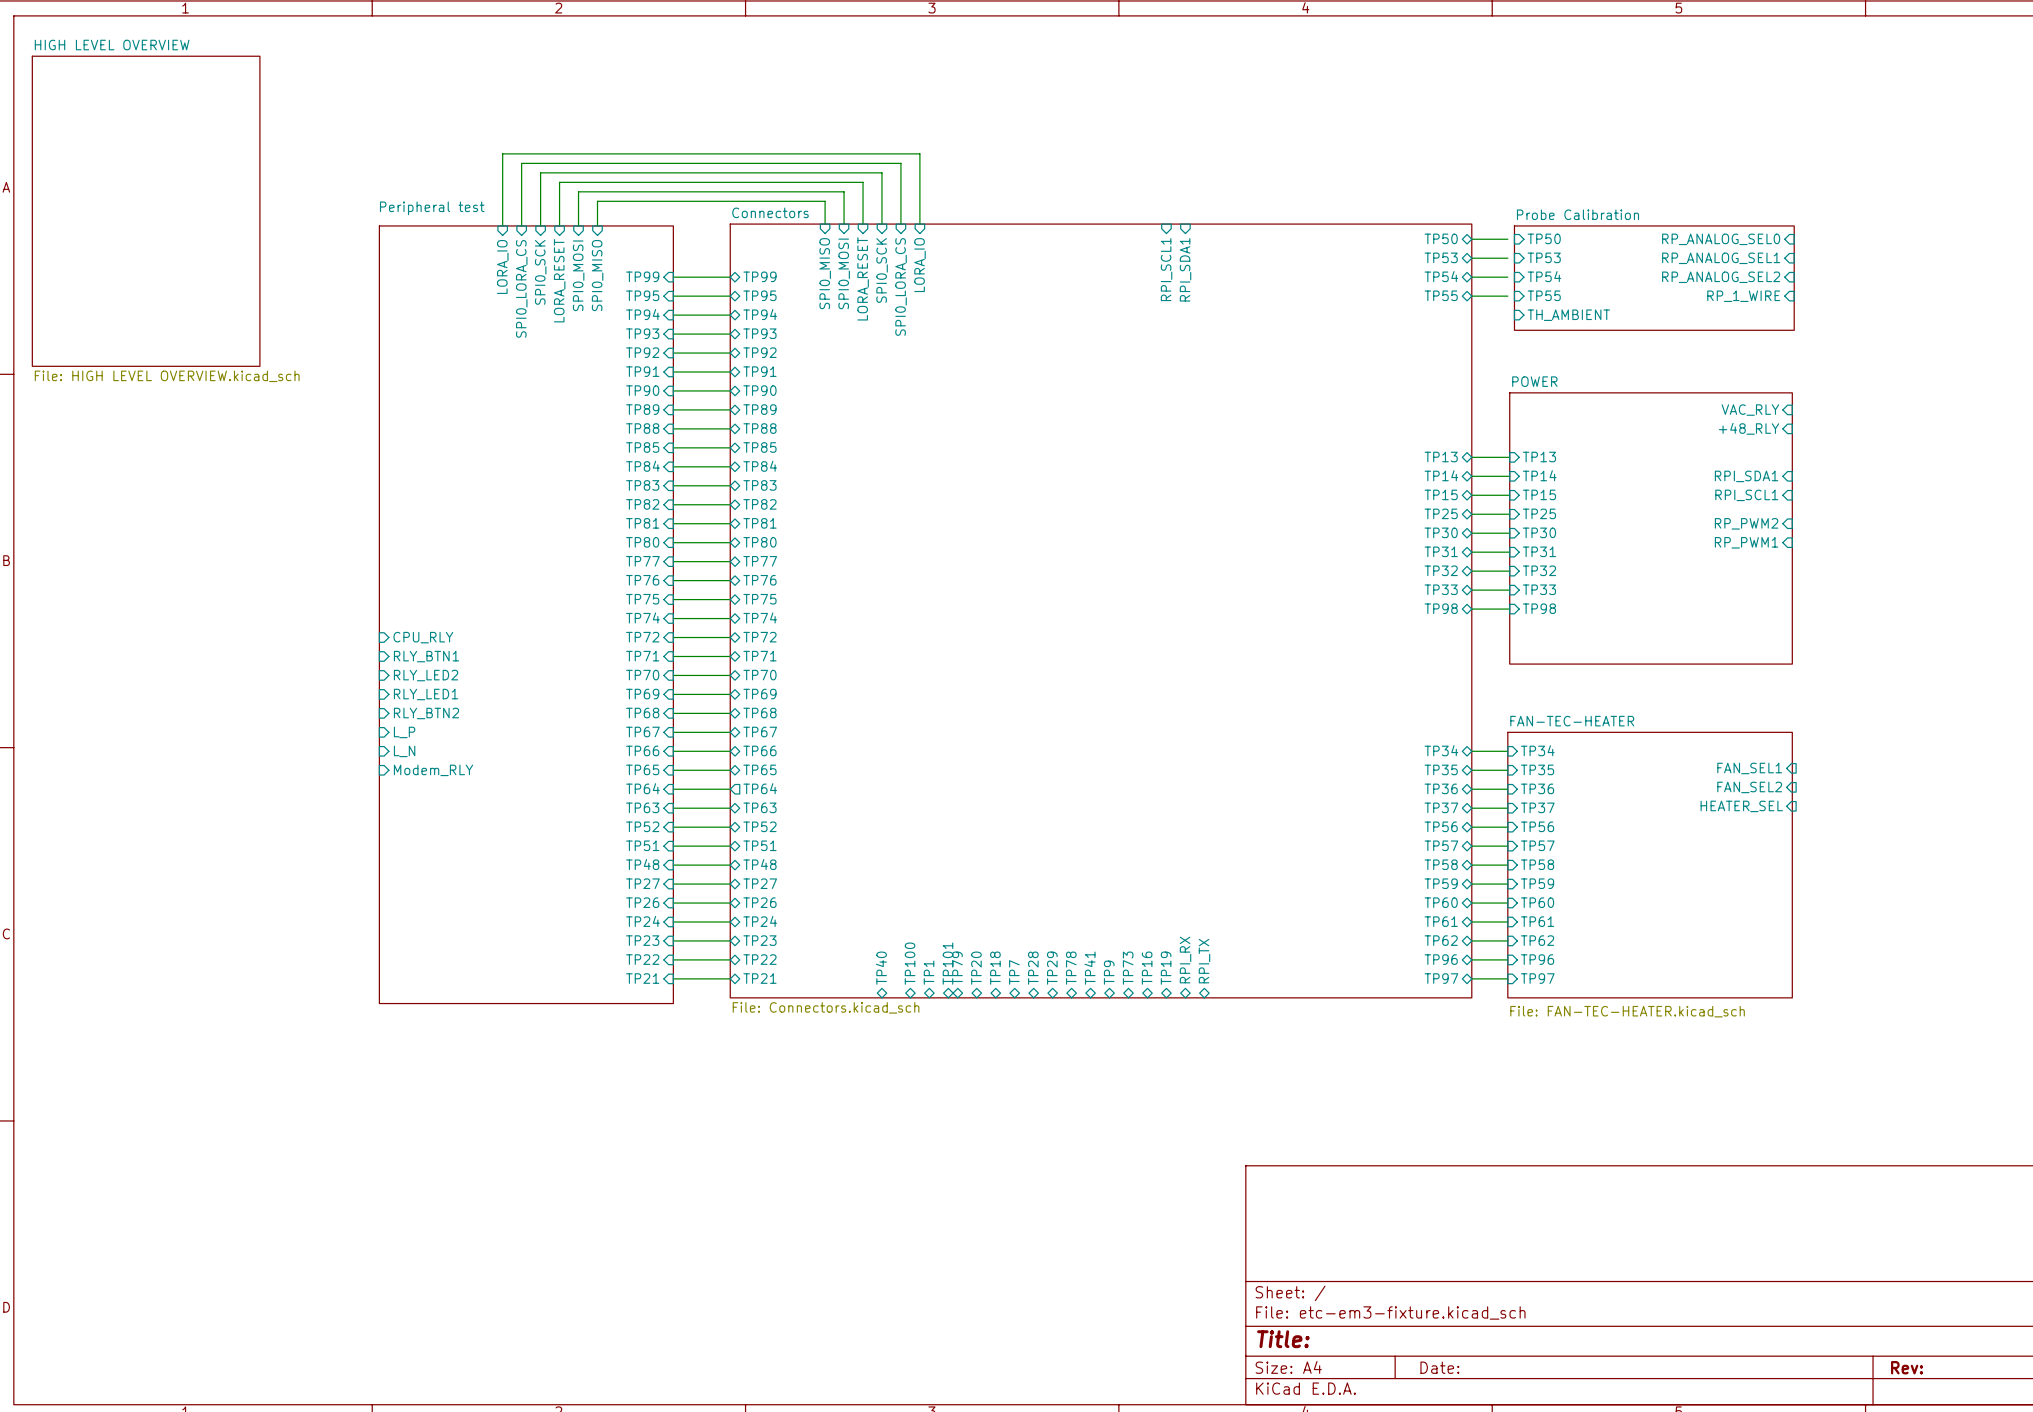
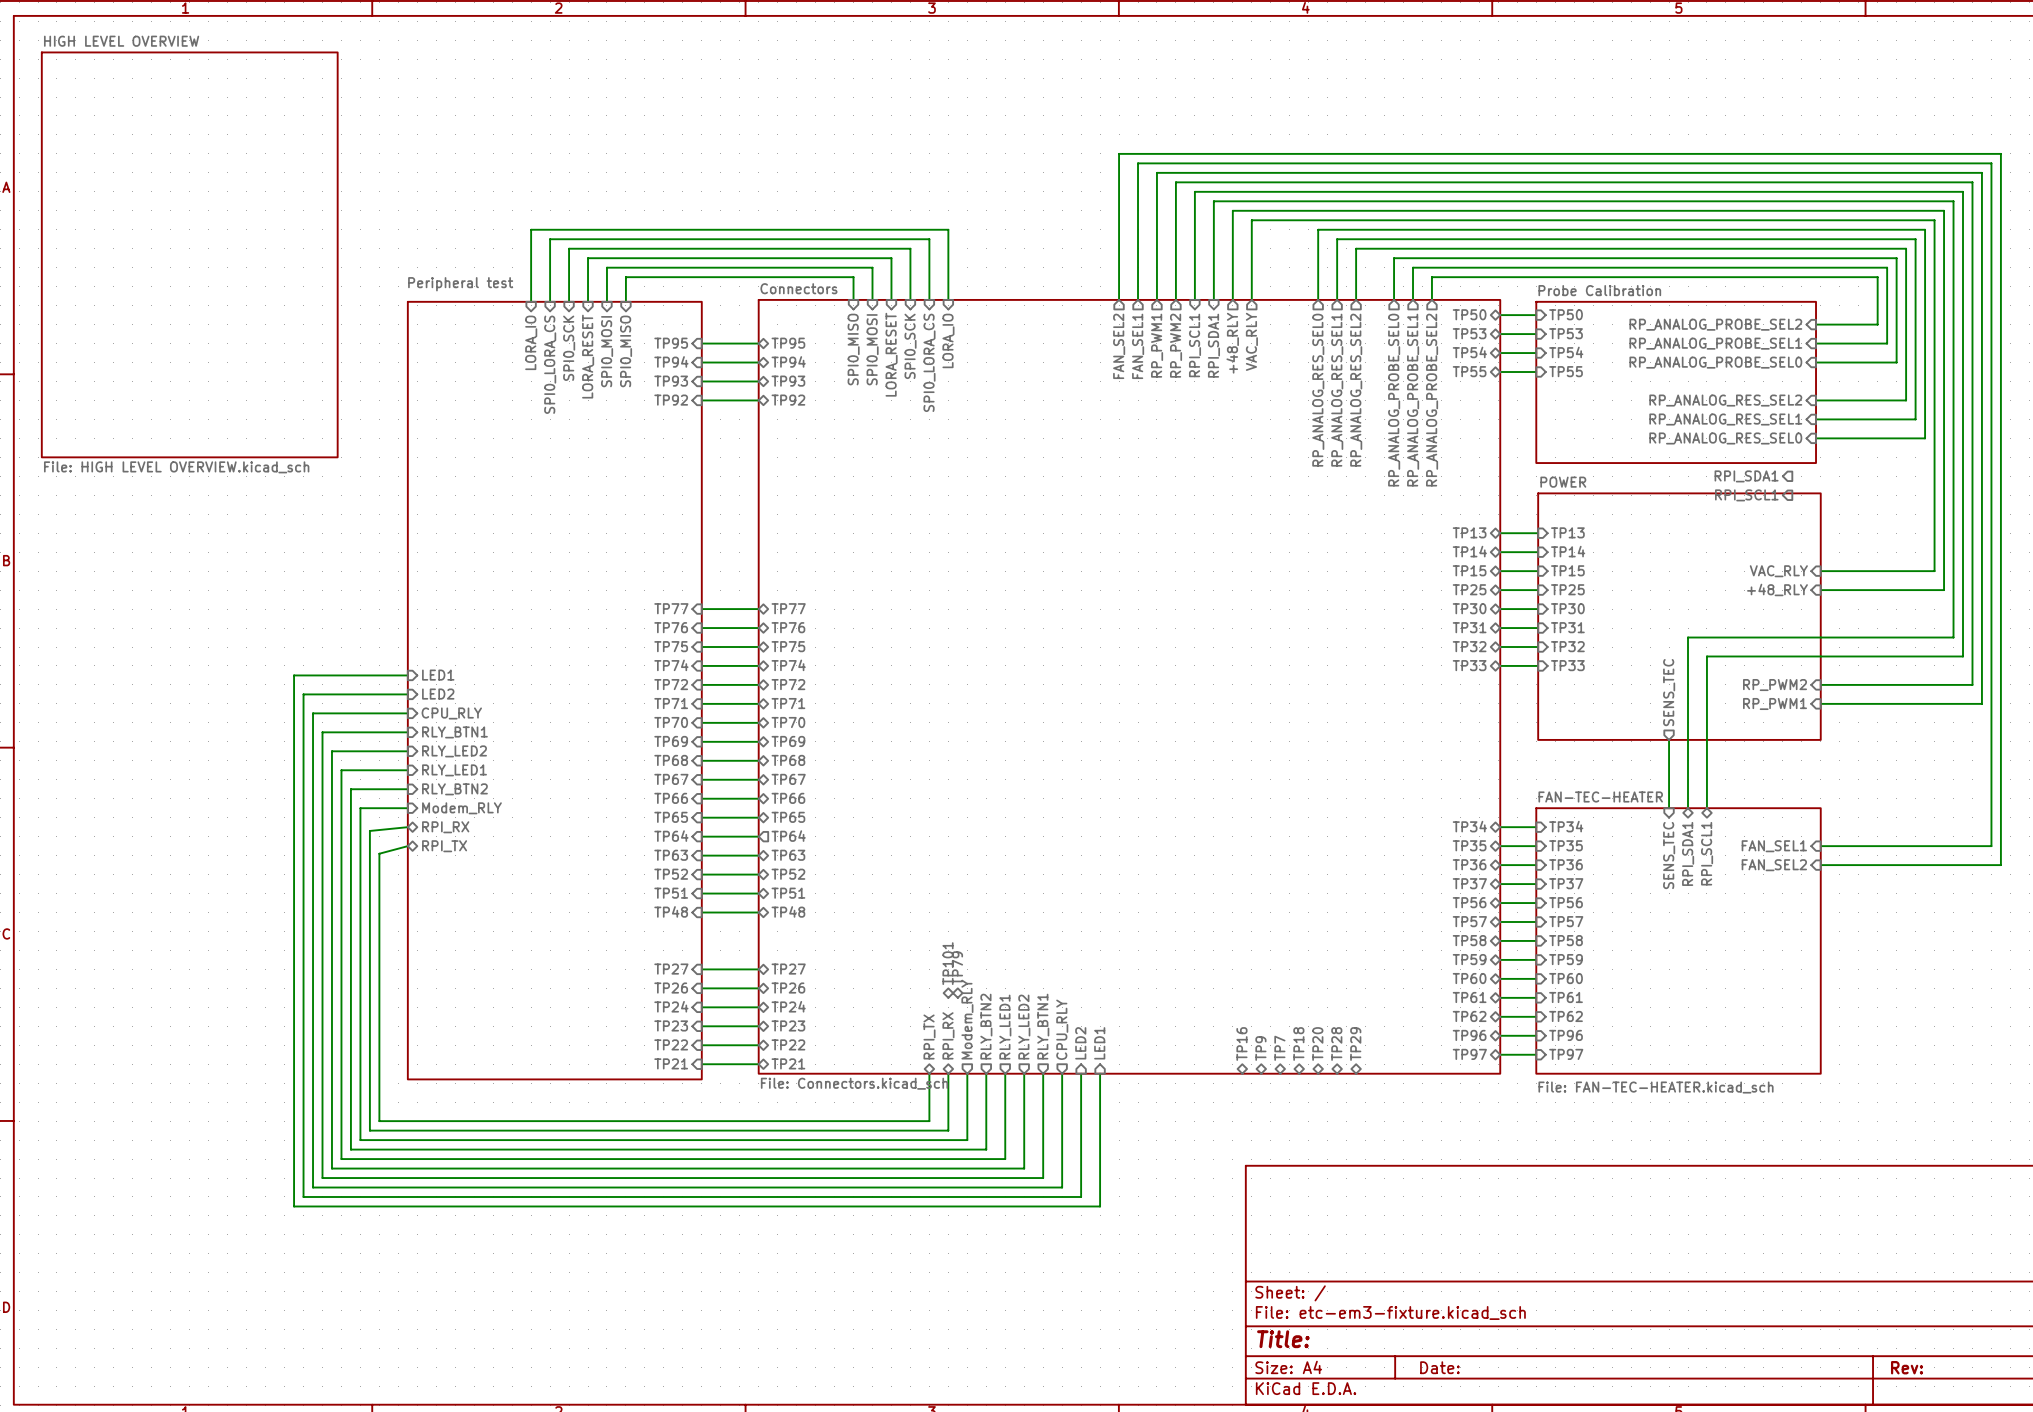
sheet HIGH LEVEL OVERVIEW: File: HIGH LEVEL OVERVIEW.kicad_sch (146, 211) -> none
wire: (825, 224) (825, 201) (597, 201) (597, 225) -> none
wire: (844, 224) (844, 191) (578, 191) (578, 225) -> (872, 299) (872, 267) (606, 267) (606, 301)
wire: (863, 224) (863, 182) (559, 182) (559, 225) -> (891, 299) (891, 258) (588, 258) (588, 301)
wire: (881, 224) (881, 172) (540, 172) (540, 225) -> (910, 299) (910, 248) (569, 248) (569, 301)
wire: (900, 224) (900, 163) (521, 163) (521, 225) -> (929, 299) (929, 239) (550, 239) (550, 301)
wire: (919, 224) (919, 153) (502, 153) (502, 225) -> (948, 299) (948, 229) (531, 229) (531, 301)
sheet pin: TP50 (1441, 238) -> none
sheet pin: TP50 (1544, 238) -> none
wire: none -> (1471, 239) (1337, 239) (1337, 299)
wire: none -> (1507, 239) (1915, 239) (1915, 419) (1816, 419)
sheet pin: RP_ANALOG_SEL0 (1721, 239) -> none
sheet HIGH LEVEL OVERVIEW: none -> File: HIGH LEVEL OVERVIEW.kicad_sch (189, 254)
sheet pin: TP53 (1441, 257) -> none
sheet pin: TP53 (1544, 257) -> none
wire: none -> (1471, 258) (1394, 258) (1394, 299)
wire: none -> (1507, 258) (1896, 258) (1896, 362) (1816, 362)
sheet pin: RP_ANALOG_SEL1 (1721, 258) -> none
sheet pin position: LORA_IO (920, 265) -> LORA_IO (948, 340)
sheet pin position: LORA_IO (502, 266) -> LORA_IO (531, 342)
sheet pin position: RPI_SCL1 (1166, 269) -> RPI_SCL1 (1195, 345)
sheet pin position: RPI_SDA1 (1185, 269) -> RPI_SDA1 (1213, 345)
sheet pin position: SPI0_SCK (882, 270) -> SPI0_SCK (910, 346)
sheet pin position: SPI0_SCK (540, 272) -> SPI0_SCK (569, 348)
sheet pin position: SPI0_MISO (825, 273) -> SPI0_MISO (853, 349)
sheet pin position: SPI0_MOSI (844, 273) -> SPI0_MOSI (872, 349)
sheet pin position: SPI0_MOSI (578, 275) -> SPI0_MOSI (607, 351)
sheet pin position: SPI0_MISO (597, 275) -> SPI0_MISO (626, 351)
sheet pin: TP99 (642, 276) -> none
sheet pin: TP99 (759, 276) -> none
sheet pin: TP54 (1441, 276) -> none
sheet pin: TP54 (1544, 276) -> none
wire: none -> (673, 277) (625, 277) (625, 301)
wire: none -> (730, 277) (853, 277) (853, 299)
wire: none -> (1471, 277) (1431, 277) (1431, 299)
wire: none -> (1507, 277) (1877, 277) (1877, 324) (1816, 324)
sheet pin: RP_ANALOG_SEL2 (1721, 277) -> none
sheet pin position: LORA_RESET (863, 278) -> LORA_RESET (891, 354)
sheet Probe Calibration: (1654, 278) -> none
sheet pin position: LORA_RESET (559, 280) -> LORA_RESET (588, 356)
sheet pin position: SPI0_LORA_CS (901, 286) -> SPI0_LORA_CS (929, 362)
sheet pin position: SPI0_LORA_CS (521, 288) -> SPI0_LORA_CS (550, 364)
sheet pin: TP95 (642, 295) -> none
sheet pin: TP95 (759, 295) -> none
sheet pin: TP55 (1441, 295) -> TP50 (1469, 314)
sheet pin: TP55 (1544, 295) -> TP50 (1566, 314)
wire: (673, 296) (730, 296) -> (701, 343) (758, 343)
wire: (1471, 296) (1507, 296) -> (1500, 372) (1536, 372)
sheet pin: RP_1_WIRE (1743, 296) -> none
wire: none -> (1119, 299) (1119, 153) (2000, 153) (2000, 865) (1820, 865)
wire: none -> (1138, 299) (1138, 163) (1991, 163) (1991, 846) (1820, 846)
wire: none -> (1156, 299) (1156, 172) (1981, 172) (1981, 703) (1820, 703)
wire: none -> (1175, 299) (1175, 182) (1972, 182) (1972, 684) (1820, 684)
wire: none -> (1194, 299) (1194, 191) (1963, 191) (1963, 656) (1706, 656) (1706, 808)
wire: none -> (1213, 299) (1213, 201) (1953, 201) (1953, 637) (1688, 637) (1688, 808)
wire: none -> (1232, 299) (1232, 210) (1944, 210) (1944, 590) (1820, 590)
wire: none -> (1251, 299) (1251, 220) (1934, 220) (1934, 571) (1820, 571)
wire: none -> (1318, 299) (1318, 229) (1925, 229) (1925, 438) (1816, 438)
wire: none -> (1356, 299) (1356, 248) (1906, 248) (1906, 400) (1816, 400)
wire: none -> (1413, 299) (1413, 267) (1887, 267) (1887, 343) (1816, 343)
sheet pin: TP94 (642, 314) -> none
sheet pin: TP94 (760, 314) -> none
wire: (673, 315) (730, 315) -> (701, 362) (758, 362)
wire: none -> (1500, 315) (1536, 315)
sheet pin: TH_AMBIENT (1568, 315) -> none
sheet pin: none -> RP_ANALOG_PROBE_SEL2 (1715, 324)
sheet pin: TP93 (642, 333) -> none
sheet pin: TP93 (759, 333) -> none
sheet pin: none -> TP53 (1469, 333)
sheet pin: none -> TP53 (1566, 333)
wire: (673, 334) (730, 334) -> (701, 381) (758, 381)
wire: none -> (1500, 334) (1536, 334)
sheet pin: none -> VAC_RLY (1251, 341)
sheet pin: none -> TP95 (671, 343)
sheet pin: none -> TP95 (788, 343)
sheet pin: none -> +48_RLY (1232, 343)
sheet pin: none -> RP_ANALOG_PROBE_SEL1 (1715, 343)
sheet pin: none -> RP_PWM1 (1157, 345)
sheet pin: none -> RP_PWM2 (1176, 345)
sheet pin: none -> FAN_SEL2 (1119, 346)
sheet pin: none -> FAN_SEL1 (1138, 346)
sheet pin: TP92 (642, 352) -> none
sheet pin: TP92 (759, 352) -> none
sheet pin: none -> TP54 (1469, 352)
sheet pin: none -> TP54 (1566, 352)
wire: (673, 353) (730, 353) -> (701, 400) (758, 400)
wire: none -> (1500, 353) (1536, 353)
sheet pin: none -> TP94 (671, 361)
sheet pin: none -> TP94 (788, 361)
sheet pin: none -> RP_ANALOG_PROBE_SEL0 (1715, 362)
sheet pin: TP91 (642, 371) -> none
sheet pin: TP91 (759, 371) -> none
sheet pin: none -> TP55 (1469, 371)
sheet pin: none -> TP55 (1566, 371)
wire: (673, 372) (730, 372) -> none
sheet pin: none -> TP93 (671, 381)
sheet pin: none -> TP93 (788, 381)
sheet Probe Calibration: none -> (1676, 382)
sheet pin: TP90 (642, 390) -> none
wire: (673, 390) (730, 390) -> none
sheet pin: TP90 (759, 390) -> none
sheet pin: none -> RP_ANALOG_RES_SEL0 (1318, 390)
sheet pin: none -> RP_ANALOG_RES_SEL1 (1337, 390)
sheet pin: none -> RP_ANALOG_RES_SEL2 (1356, 390)
sheet pin: none -> TP92 (671, 400)
sheet pin: none -> TP92 (788, 400)
sheet pin: none -> RP_ANALOG_PROBE_SEL0 (1394, 400)
sheet pin: none -> RP_ANALOG_PROBE_SEL1 (1413, 400)
sheet pin: none -> RP_ANALOG_PROBE_SEL2 (1432, 400)
sheet pin: none -> RP_ANALOG_RES_SEL2 (1725, 400)
sheet pin: TP89 (642, 409) -> none
wire: (673, 409) (730, 409) -> none
sheet pin: TP89 (759, 409) -> none
sheet pin position: VAC_RLY (1750, 410) -> VAC_RLY (1778, 571)
sheet pin: none -> RP_ANALOG_RES_SEL1 (1725, 419)
sheet pin: TP88 (642, 428) -> none
wire: (673, 428) (730, 428) -> none
sheet pin: TP88 (759, 428) -> none
sheet pin position: +48_RLY (1749, 428) -> +48_RLY (1777, 589)
sheet pin: none -> RP_ANALOG_RES_SEL0 (1725, 438)
sheet pin: TP85 (642, 447) -> none
wire: (673, 447) (730, 447) -> none
sheet pin: TP85 (759, 447) -> none
sheet pin: TP13 (1441, 456) -> none
sheet pin: TP13 (1539, 456) -> none
wire: (1471, 457) (1509, 457) -> none
sheet pin: TP84 (642, 466) -> none
wire: (673, 466) (730, 466) -> none
sheet pin: TP84 (760, 466) -> none
sheet pin: TP14 (1441, 475) -> none
sheet pin: TP14 (1539, 475) -> none
wire: (1471, 476) (1509, 476) -> (1500, 628) (1538, 628)
sheet pin: TP83 (642, 485) -> none
wire: (673, 485) (730, 485) -> none
sheet pin: TP83 (759, 485) -> none
sheet pin: TP15 (1441, 494) -> none
sheet pin: TP15 (1539, 494) -> none
wire: (1471, 495) (1509, 495) -> (1500, 647) (1538, 647)
sheet pin: TP82 (642, 504) -> none
wire: (673, 504) (730, 504) -> none
sheet pin: TP82 (759, 504) -> none
sheet pin: TP25 (1441, 513) -> none
sheet pin: TP25 (1539, 513) -> none
wire: (1471, 514) (1509, 514) -> (1500, 665) (1538, 665)
sheet pin: TP81 (642, 523) -> none
wire: (673, 523) (730, 523) -> none
sheet pin: TP81 (759, 523) -> none
sheet pin position: RP_PWM2 (1746, 523) -> RP_PWM2 (1775, 685)
sheet POWER: (1651, 528) -> none
sheet pin: TP30 (1441, 532) -> none
sheet pin: none -> TP13 (1469, 532)
sheet pin: TP30 (1539, 532) -> none
sheet pin: none -> TP13 (1567, 532)
wire: (1471, 533) (1500, 533) -> (1509, 533) (1538, 533)
sheet pin: TP80 (642, 542) -> none
wire: (673, 542) (730, 542) -> none
sheet pin: TP80 (759, 542) -> none
sheet pin position: RP_PWM1 (1746, 542) -> RP_PWM1 (1775, 703)
sheet pin: TP31 (1441, 551) -> none
sheet pin: none -> TP14 (1469, 551)
sheet pin: TP31 (1539, 551) -> none
sheet pin: none -> TP14 (1568, 551)
wire: (1471, 552) (1500, 552) -> (1509, 552) (1538, 552)
sheet pin: TP77 (642, 561) -> none
wire: (673, 561) (730, 561) -> (701, 609) (758, 609)
sheet pin: TP77 (760, 561) -> none
sheet pin: TP32 (1441, 570) -> TP25 (1469, 589)
sheet pin: none -> TP15 (1469, 570)
sheet pin: TP32 (1539, 570) -> TP25 (1567, 589)
sheet pin: none -> TP15 (1567, 570)
wire: (1471, 571) (1500, 571) -> (1509, 571) (1538, 571)
sheet pin: TP76 (642, 580) -> none
wire: (673, 580) (730, 580) -> (701, 628) (758, 628)
sheet pin: TP76 (759, 580) -> none
sheet pin: TP33 (1441, 589) -> TP30 (1469, 608)
sheet pin: TP33 (1539, 589) -> TP30 (1567, 608)
wire: (1471, 590) (1500, 590) -> (1509, 590) (1538, 590)
sheet pin: TP75 (642, 599) -> none
wire: (673, 599) (730, 599) -> (701, 647) (758, 647)
sheet pin: TP75 (759, 599) -> none
sheet pin: none -> TP77 (671, 608)
sheet pin: none -> TP77 (788, 608)
sheet pin: TP98 (1441, 608) -> none
sheet pin: TP98 (1539, 608) -> none
wire: (1471, 609) (1500, 609) -> (1509, 609) (1538, 609)
sheet Connectors position: (1101, 610) -> (1129, 686)
sheet Peripheral test position: (526, 614) -> (554, 690)
sheet POWER: none -> (1679, 616)
sheet pin: TP74 (642, 617) -> none
sheet pin: TP74 (760, 617) -> none
wire: (673, 618) (730, 618) -> (701, 665) (758, 665)
sheet pin: none -> TP76 (671, 627)
sheet pin: none -> TP76 (788, 627)
sheet pin: none -> TP31 (1469, 627)
sheet pin: none -> TP31 (1567, 627)
sheet pin position: CPU_RLY (423, 637) -> CPU_RLY (451, 713)
sheet pin: TP72 (642, 637) -> none
wire: (673, 637) (730, 637) -> (701, 684) (758, 684)
sheet pin: TP72 (759, 637) -> none
sheet pin: none -> TP75 (671, 646)
sheet pin: none -> TP75 (788, 646)
sheet pin: none -> TP32 (1469, 646)
sheet pin: none -> TP32 (1567, 646)
sheet pin position: RLY_BTN1 (426, 656) -> RLY_BTN1 (454, 732)
sheet pin: TP71 (642, 656) -> none
wire: (673, 656) (730, 656) -> (701, 703) (758, 703)
sheet pin: TP71 (759, 656) -> none
sheet pin: none -> TP74 (671, 665)
sheet pin: none -> TP74 (788, 665)
sheet pin: none -> TP33 (1469, 665)
sheet pin: none -> TP33 (1567, 665)
wire: none -> (407, 675) (294, 675) (294, 1206) (1100, 1206) (1100, 1073)
sheet pin position: RLY_LED2 (426, 675) -> RLY_LED2 (454, 751)
sheet pin: none -> LED1 (438, 675)
sheet pin: TP70 (642, 675) -> none
wire: (673, 675) (730, 675) -> (701, 722) (758, 722)
sheet pin: TP70 (759, 675) -> none
sheet pin: none -> TP72 (671, 684)
sheet pin: none -> TP72 (788, 684)
sheet pin: none -> SENS_TEC (1669, 692)
wire: none -> (407, 694) (303, 694) (303, 1196) (1081, 1196) (1081, 1073)
sheet pin position: RLY_LED1 (426, 694) -> RLY_LED1 (454, 770)
sheet pin: none -> LED2 (438, 694)
sheet pin: TP69 (642, 694) -> none
wire: (673, 694) (730, 694) -> (701, 741) (758, 741)
sheet pin: TP69 (759, 694) -> none
sheet pin: none -> TP71 (671, 703)
sheet pin: none -> TP71 (788, 703)
wire: none -> (407, 713) (313, 713) (313, 1187) (1062, 1187) (1062, 1073)
sheet pin position: RLY_BTN2 (426, 713) -> RLY_BTN2 (454, 789)
sheet pin: TP68 (642, 713) -> none
wire: (673, 713) (730, 713) -> (701, 760) (758, 760)
sheet pin: TP68 (759, 713) -> none
sheet pin: none -> TP70 (671, 722)
sheet pin: none -> TP70 (788, 722)
sheet pin: TP67 (642, 731) -> none
sheet pin: TP67 (760, 731) -> none
sheet pin: L_P (404, 732) -> none
wire: none -> (407, 732) (322, 732) (322, 1178) (1043, 1178) (1043, 1073)
wire: (673, 732) (730, 732) -> (701, 779) (758, 779)
wire: none -> (1669, 739) (1669, 808)
sheet pin: none -> TP69 (671, 741)
sheet pin: none -> TP69 (788, 741)
sheet pin: TP66 (642, 750) -> none
sheet pin: TP66 (759, 750) -> none
sheet pin: TP34 (1441, 750) -> none
sheet pin: TP34 (1537, 750) -> none
sheet pin: L_N (404, 751) -> none
wire: none -> (407, 751) (331, 751) (331, 1168) (1024, 1168) (1024, 1073)
wire: (673, 751) (730, 751) -> (701, 798) (758, 798)
wire: (1471, 751) (1507, 751) -> none
sheet pin: none -> TP68 (671, 760)
sheet pin: none -> TP68 (788, 760)
sheet pin position: FAN_SEL1 (1749, 768) -> FAN_SEL1 (1774, 846)
sheet pin: TP65 (642, 769) -> none
sheet pin: TP65 (759, 769) -> none
sheet pin: TP35 (1441, 769) -> none
sheet pin: TP35 (1537, 769) -> none
wire: none -> (407, 770) (341, 770) (341, 1159) (1005, 1159) (1005, 1073)
sheet pin position: Modem_RLY (433, 770) -> Modem_RLY (461, 808)
wire: (673, 770) (730, 770) -> (701, 817) (758, 817)
wire: (1471, 770) (1507, 770) -> none
sheet pin: none -> TP67 (671, 779)
sheet pin: none -> TP67 (788, 779)
sheet pin position: FAN_SEL2 (1749, 787) -> FAN_SEL2 (1774, 865)
sheet pin: TP64 (642, 788) -> none
sheet pin: TP64 (760, 788) -> none
sheet pin: TP36 (1441, 788) -> none
sheet pin: TP36 (1537, 788) -> none
wire: none -> (407, 789) (350, 789) (350, 1149) (986, 1149) (986, 1073)
wire: (673, 789) (730, 789) -> (701, 836) (758, 836)
wire: (1471, 789) (1507, 789) -> none
sheet pin: none -> TP66 (671, 798)
sheet pin: none -> TP66 (788, 798)
sheet pin: HEATER_SEL (1741, 806) -> none
sheet pin: TP63 (642, 807) -> none
sheet pin: TP63 (759, 807) -> none
sheet pin: TP37 (1441, 807) -> TP34 (1469, 826)
sheet pin: TP37 (1537, 807) -> TP34 (1566, 826)
wire: none -> (407, 808) (360, 808) (360, 1140) (967, 1140) (967, 1073)
wire: (673, 808) (730, 808) -> (701, 855) (758, 855)
wire: (1471, 808) (1507, 808) -> none
sheet pin: none -> TP65 (671, 817)
sheet pin: none -> TP65 (788, 817)
sheet pin: TP52 (642, 826) -> none
sheet pin: TP52 (759, 826) -> none
sheet pin: TP56 (1441, 826) -> none
sheet pin: TP56 (1537, 826) -> none
wire: none -> (407, 827) (369, 830) (369, 1130) (948, 1130) (948, 1073)
sheet pin: none -> RPI_RX (445, 827)
wire: (673, 827) (730, 827) -> (701, 874) (758, 874)
wire: (1471, 827) (1500, 827) -> (1507, 827) (1536, 827)
sheet pin: none -> TP64 (671, 836)
sheet pin: none -> TP64 (788, 836)
sheet pin: TP51 (642, 845) -> none
sheet pin: TP51 (759, 845) -> none
sheet pin: TP57 (1441, 845) -> none
sheet pin: none -> TP35 (1469, 845)
sheet pin: TP57 (1537, 845) -> none
sheet pin: none -> TP35 (1566, 845)
wire: none -> (407, 846) (379, 853) (379, 1121) (929, 1121) (929, 1073)
sheet pin: none -> RPI_TX (444, 846)
wire: (673, 846) (730, 846) -> (701, 893) (758, 893)
wire: (1471, 846) (1500, 846) -> (1507, 846) (1536, 846)
sheet pin: none -> RPI_SDA1 (1688, 853)
sheet pin: none -> RPI_SCL1 (1707, 853)
sheet pin: none -> TP63 (671, 855)
sheet pin: none -> TP63 (788, 855)
sheet pin: none -> SENS_TEC (1669, 855)
sheet pin: TP48 (642, 864) -> none
sheet pin: TP48 (759, 864) -> none
sheet pin: TP58 (1441, 864) -> none
sheet pin: none -> TP36 (1469, 864)
sheet pin: TP58 (1537, 864) -> none
sheet pin: none -> TP36 (1566, 864)
wire: (673, 865) (730, 865) -> (701, 912) (758, 912)
wire: (1471, 865) (1500, 865) -> (1507, 865) (1536, 865)
sheet FAN-TEC-HEATER position: (1650, 865) -> (1678, 940)
sheet pin: TP27 (642, 883) -> TP52 (671, 874)
sheet pin: TP27 (760, 883) -> TP52 (788, 874)
sheet pin: TP59 (1441, 883) -> none
sheet pin: none -> TP37 (1469, 883)
sheet pin: TP59 (1537, 883) -> none
sheet pin: none -> TP37 (1566, 883)
wire: (673, 884) (730, 884) -> (701, 1064) (758, 1064)
wire: (1471, 884) (1500, 884) -> (1507, 884) (1536, 884)
sheet pin: none -> TP51 (671, 893)
sheet pin: none -> TP51 (788, 893)
sheet pin: TP26 (642, 902) -> none
sheet pin: TP26 (759, 902) -> none
sheet pin: TP60 (1441, 902) -> none
sheet pin: none -> TP56 (1469, 902)
sheet pin: TP60 (1537, 902) -> none
sheet pin: none -> TP56 (1566, 902)
wire: (673, 903) (730, 903) -> (701, 1045) (758, 1045)
wire: (1471, 903) (1500, 903) -> (1507, 903) (1536, 903)
sheet pin: TP24 (642, 921) -> TP48 (671, 911)
wire: (673, 921) (730, 921) -> (701, 969) (758, 969)
sheet pin: TP24 (760, 921) -> TP48 (788, 911)
sheet pin: TP61 (1441, 921) -> none
sheet pin: none -> TP57 (1469, 921)
wire: (1471, 921) (1500, 921) -> (1507, 921) (1536, 921)
sheet pin: TP61 (1537, 921) -> none
sheet pin: none -> TP57 (1566, 921)
sheet pin: TP23 (642, 940) -> none
wire: (673, 940) (730, 940) -> (701, 988) (758, 988)
sheet pin: TP23 (759, 940) -> none
sheet pin: TP62 (1441, 940) -> none
sheet pin: none -> TP58 (1469, 940)
wire: (1471, 940) (1500, 940) -> (1507, 940) (1536, 940)
sheet pin: TP62 (1537, 940) -> none
sheet pin: none -> TP58 (1566, 940)
sheet pin: TP22 (642, 959) -> none
wire: (673, 959) (730, 959) -> (701, 1007) (758, 1007)
sheet pin: TP22 (759, 959) -> none
sheet pin: TP96 (1441, 959) -> none
sheet pin: none -> TP59 (1469, 959)
wire: (1471, 959) (1500, 959) -> (1507, 959) (1536, 959)
sheet pin: TP96 (1537, 959) -> none
sheet pin: none -> TP59 (1566, 959)
sheet pin: RPI_RX (1185, 960) -> none
sheet pin: RPI_TX (1204, 961) -> none
sheet pin: TP100 (910, 963) -> none
sheet pin: TP40 (881, 968) -> none
sheet pin: TP20 (976, 968) -> none
sheet pin: TP18 (995, 968) -> none
sheet pin: TP28 (1033, 968) -> none
sheet pin: TP29 (1052, 968) -> none
sheet pin: TP78 (1071, 968) -> none
sheet pin: TP41 (1090, 968) -> none
sheet pin: TP73 (1128, 968) -> none
sheet pin position: TP16 (1147, 968) -> TP16 (1241, 1043)
sheet pin: TP19 (1166, 968) -> none
sheet pin: none -> TP27 (671, 969)
sheet pin: none -> TP27 (788, 969)
sheet pin: TP1 (929, 972) -> none
sheet pin: TP7 (1014, 972) -> none
sheet pin position: TP9 (1109, 972) -> TP9 (1260, 1048)
sheet pin: TP21 (642, 978) -> none
wire: (673, 978) (730, 978) -> (701, 1026) (758, 1026)
sheet pin: TP21 (759, 978) -> none
sheet pin: TP97 (1441, 978) -> none
sheet pin: none -> TP60 (1469, 978)
wire: (1471, 978) (1500, 978) -> (1507, 978) (1536, 978)
sheet pin: TP97 (1537, 978) -> none
sheet pin: none -> TP60 (1566, 978)
sheet pin: none -> TP26 (671, 988)
sheet pin: none -> TP26 (788, 988)
sheet pin: none -> TP61 (1469, 997)
sheet pin: none -> TP61 (1566, 997)
sheet pin: none -> TP24 (671, 1006)
sheet pin: none -> TP24 (788, 1006)
sheet pin: none -> TP62 (1469, 1016)
wire: none -> (1500, 1016) (1536, 1016)
sheet pin: none -> TP62 (1566, 1016)
sheet pin: none -> Modem_RLY (967, 1019)
sheet pin: none -> TP23 (671, 1025)
sheet pin: none -> TP23 (788, 1025)
sheet pin: none -> RLY_BTN2 (986, 1026)
sheet pin: none -> RLY_BTN1 (1043, 1026)
sheet pin: none -> RLY_LED1 (1005, 1027)
sheet pin: none -> RLY_LED2 (1024, 1027)
sheet pin: none -> CPU_RLY (1062, 1029)
sheet pin: none -> RPI_RX (948, 1035)
sheet pin: none -> TP96 (1469, 1035)
wire: none -> (1500, 1035) (1536, 1035)
sheet pin: none -> TP96 (1566, 1035)
sheet pin: none -> RPI_TX (929, 1036)
sheet pin: none -> LED2 (1080, 1043)
sheet pin: none -> LED1 (1099, 1043)
sheet pin: none -> TP18 (1298, 1043)
sheet pin: none -> TP20 (1317, 1043)
sheet pin: none -> TP28 (1336, 1043)
sheet pin: none -> TP29 (1355, 1043)
sheet pin: none -> TP22 (671, 1044)
sheet pin: none -> TP22 (788, 1044)
sheet pin: none -> TP7 (1279, 1048)
sheet pin: none -> TP97 (1469, 1054)
wire: none -> (1500, 1054) (1536, 1054)
sheet pin: none -> TP97 (1566, 1054)
sheet pin: none -> TP21 (671, 1063)
sheet pin: none -> TP21 (788, 1063)

